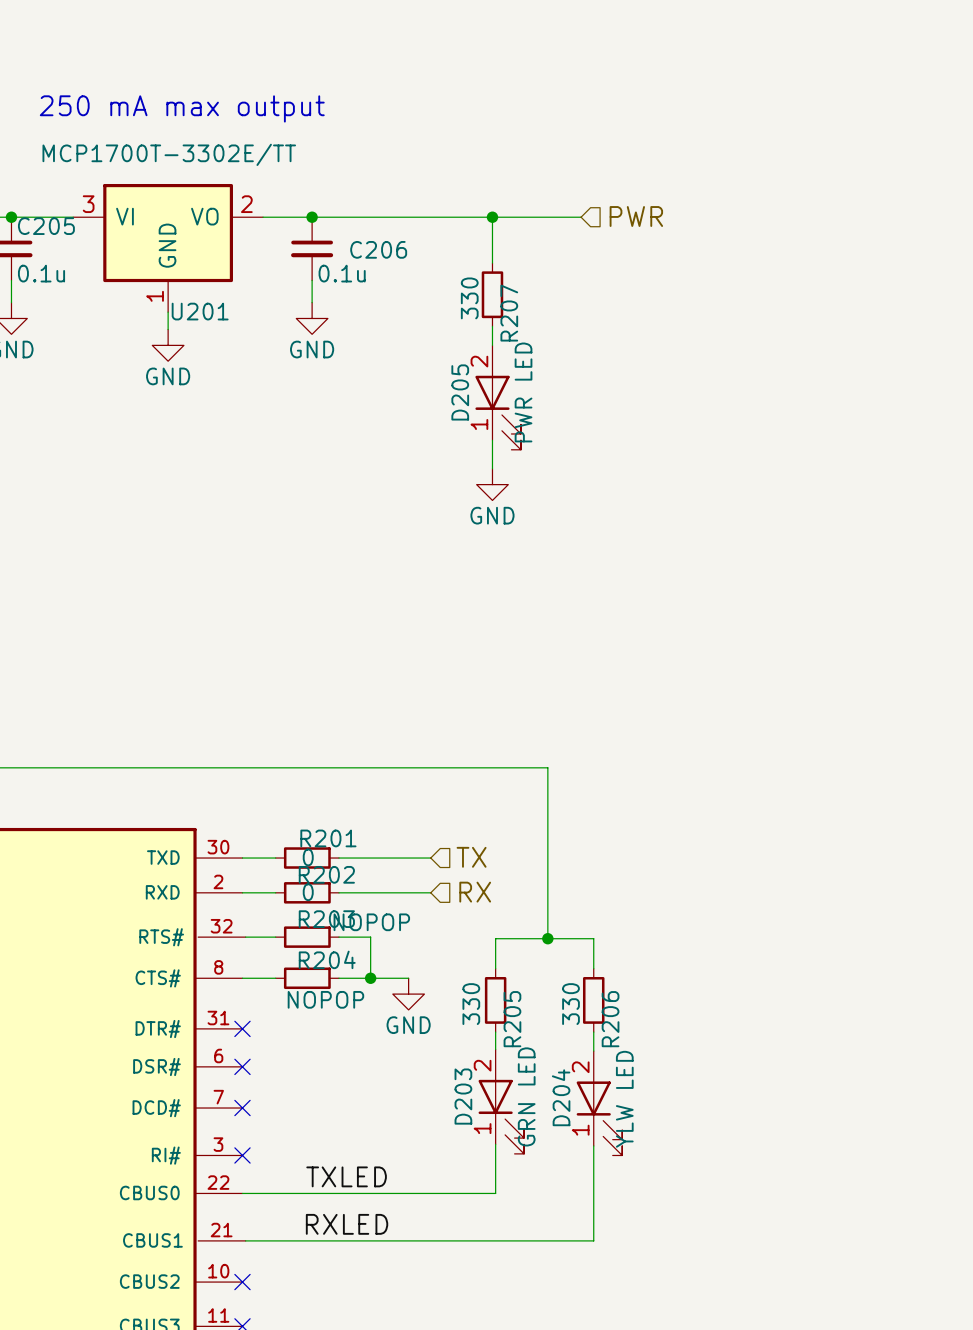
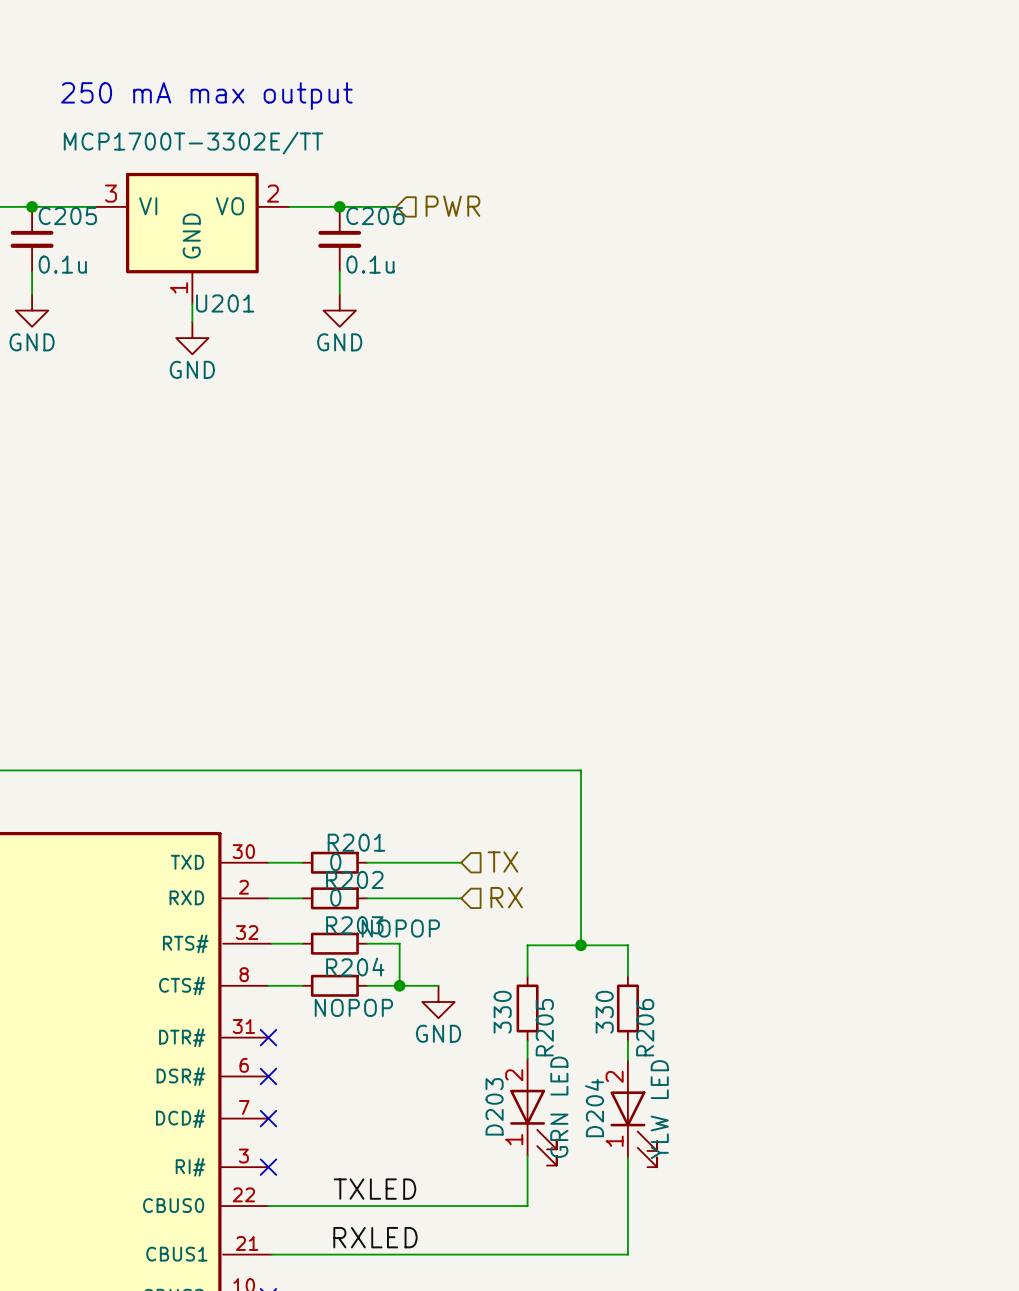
hierarchical label position: PWR (636, 216) -> PWR (452, 206)
wire: (367, 217) (581, 217) -> none
wire: (492, 217) (492, 263) -> none
junction: (492, 217) -> none
C206 name position: C206 (378, 249) -> C206 (375, 216)
R207: 330 (492, 294) -> none
wire: (492, 326) (492, 345) -> none
D205: PWR LED (498, 397) -> none
wire: (492, 440) (492, 468) -> none
power symbol: GND (492, 484) -> none

